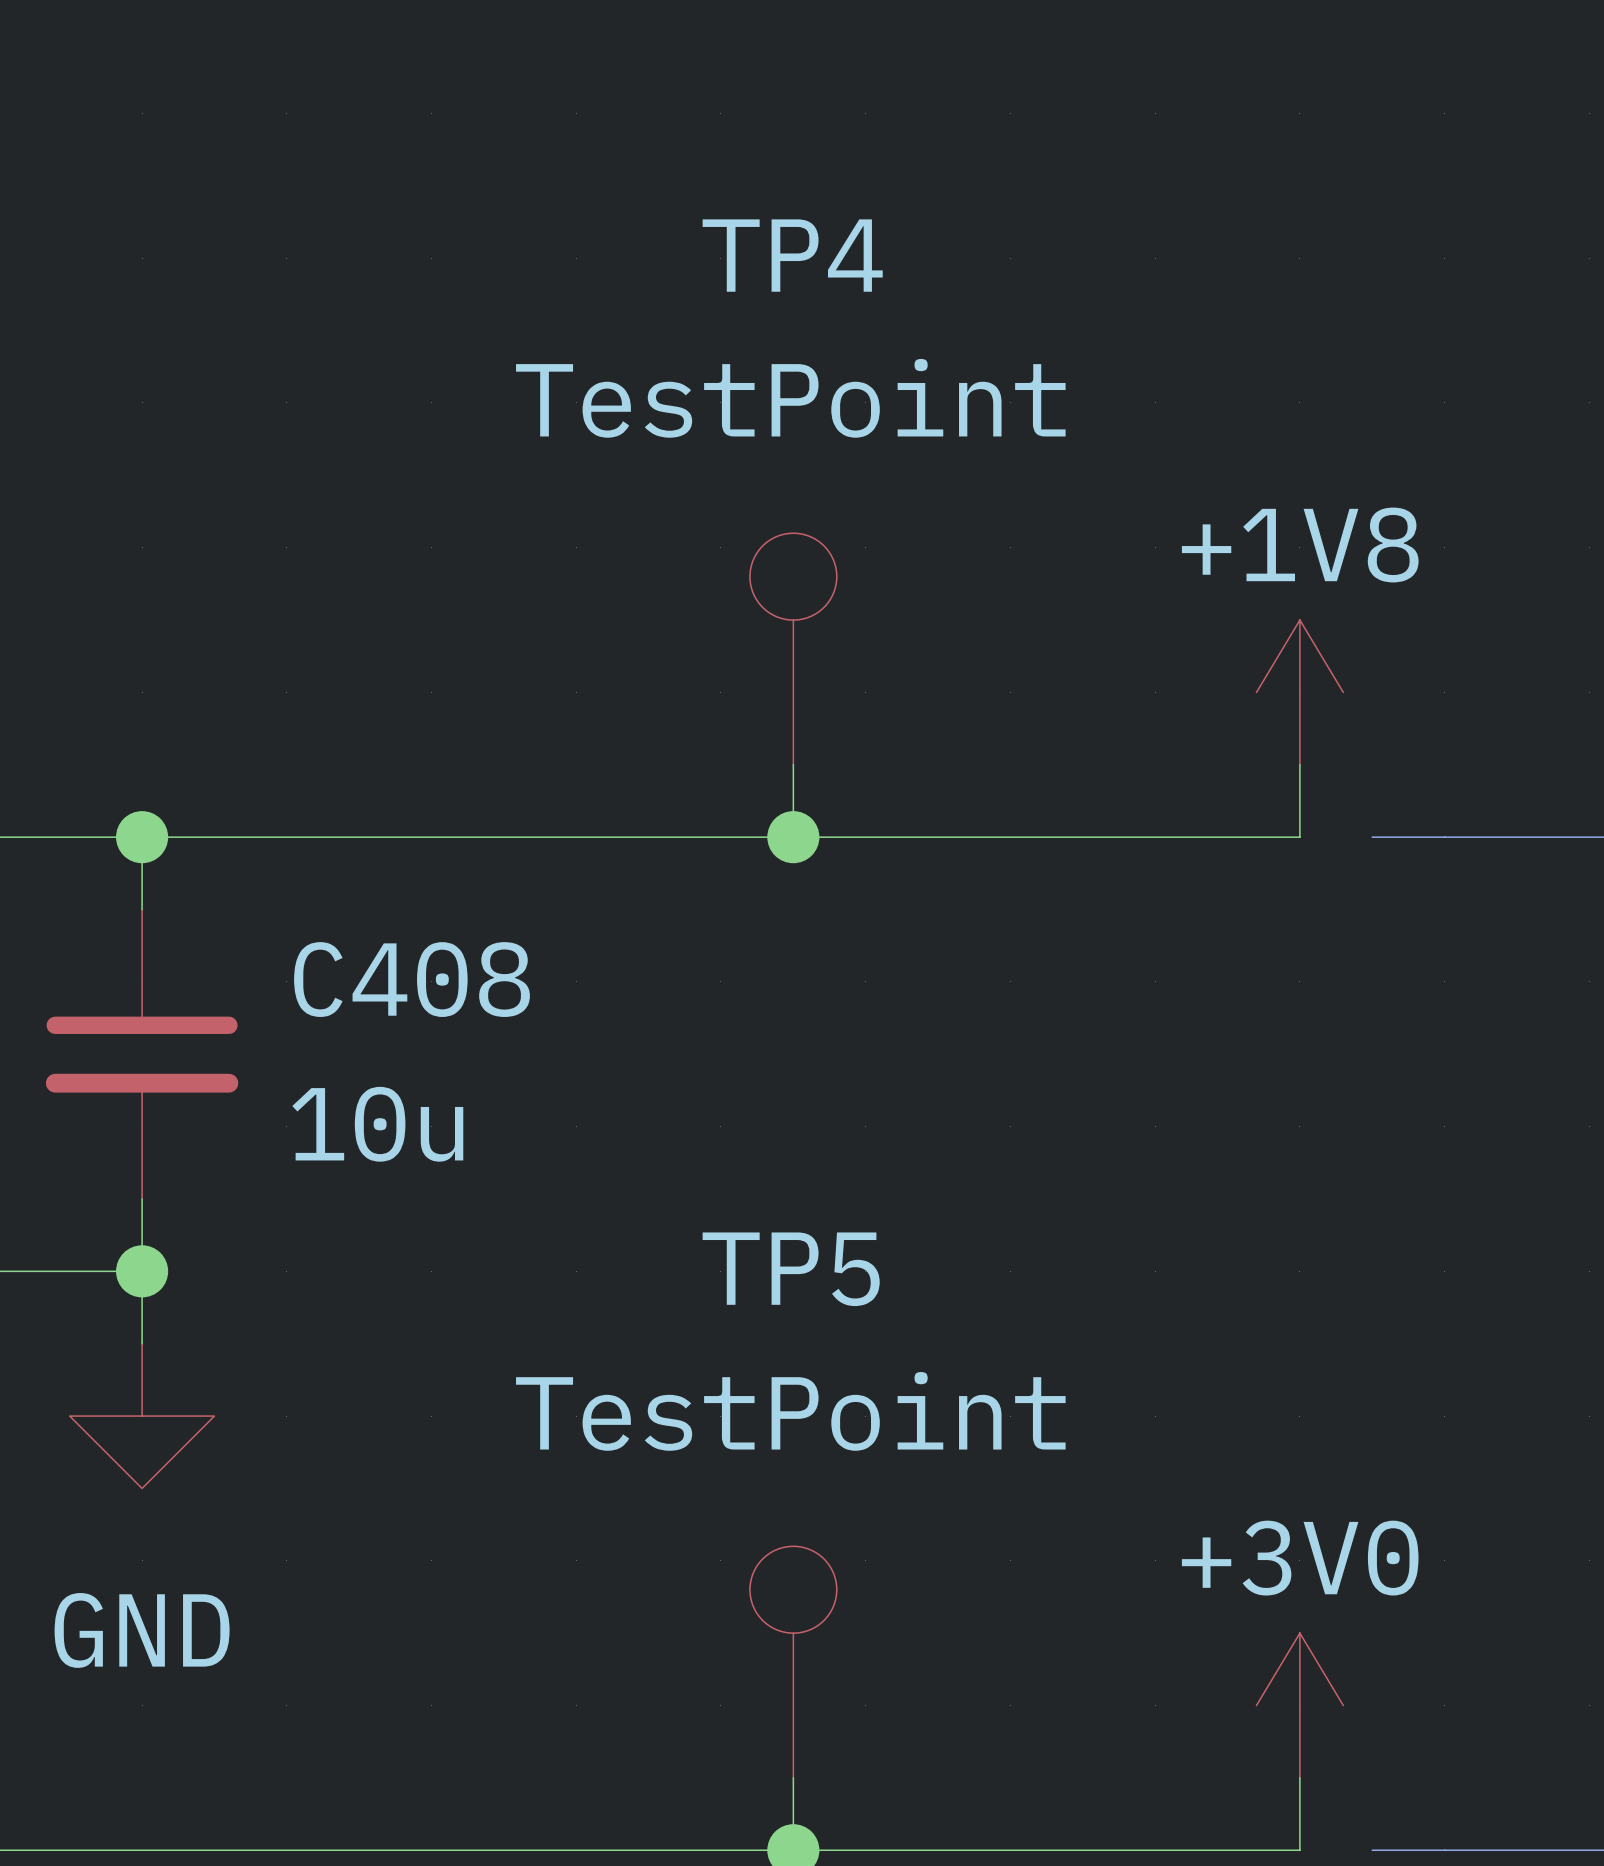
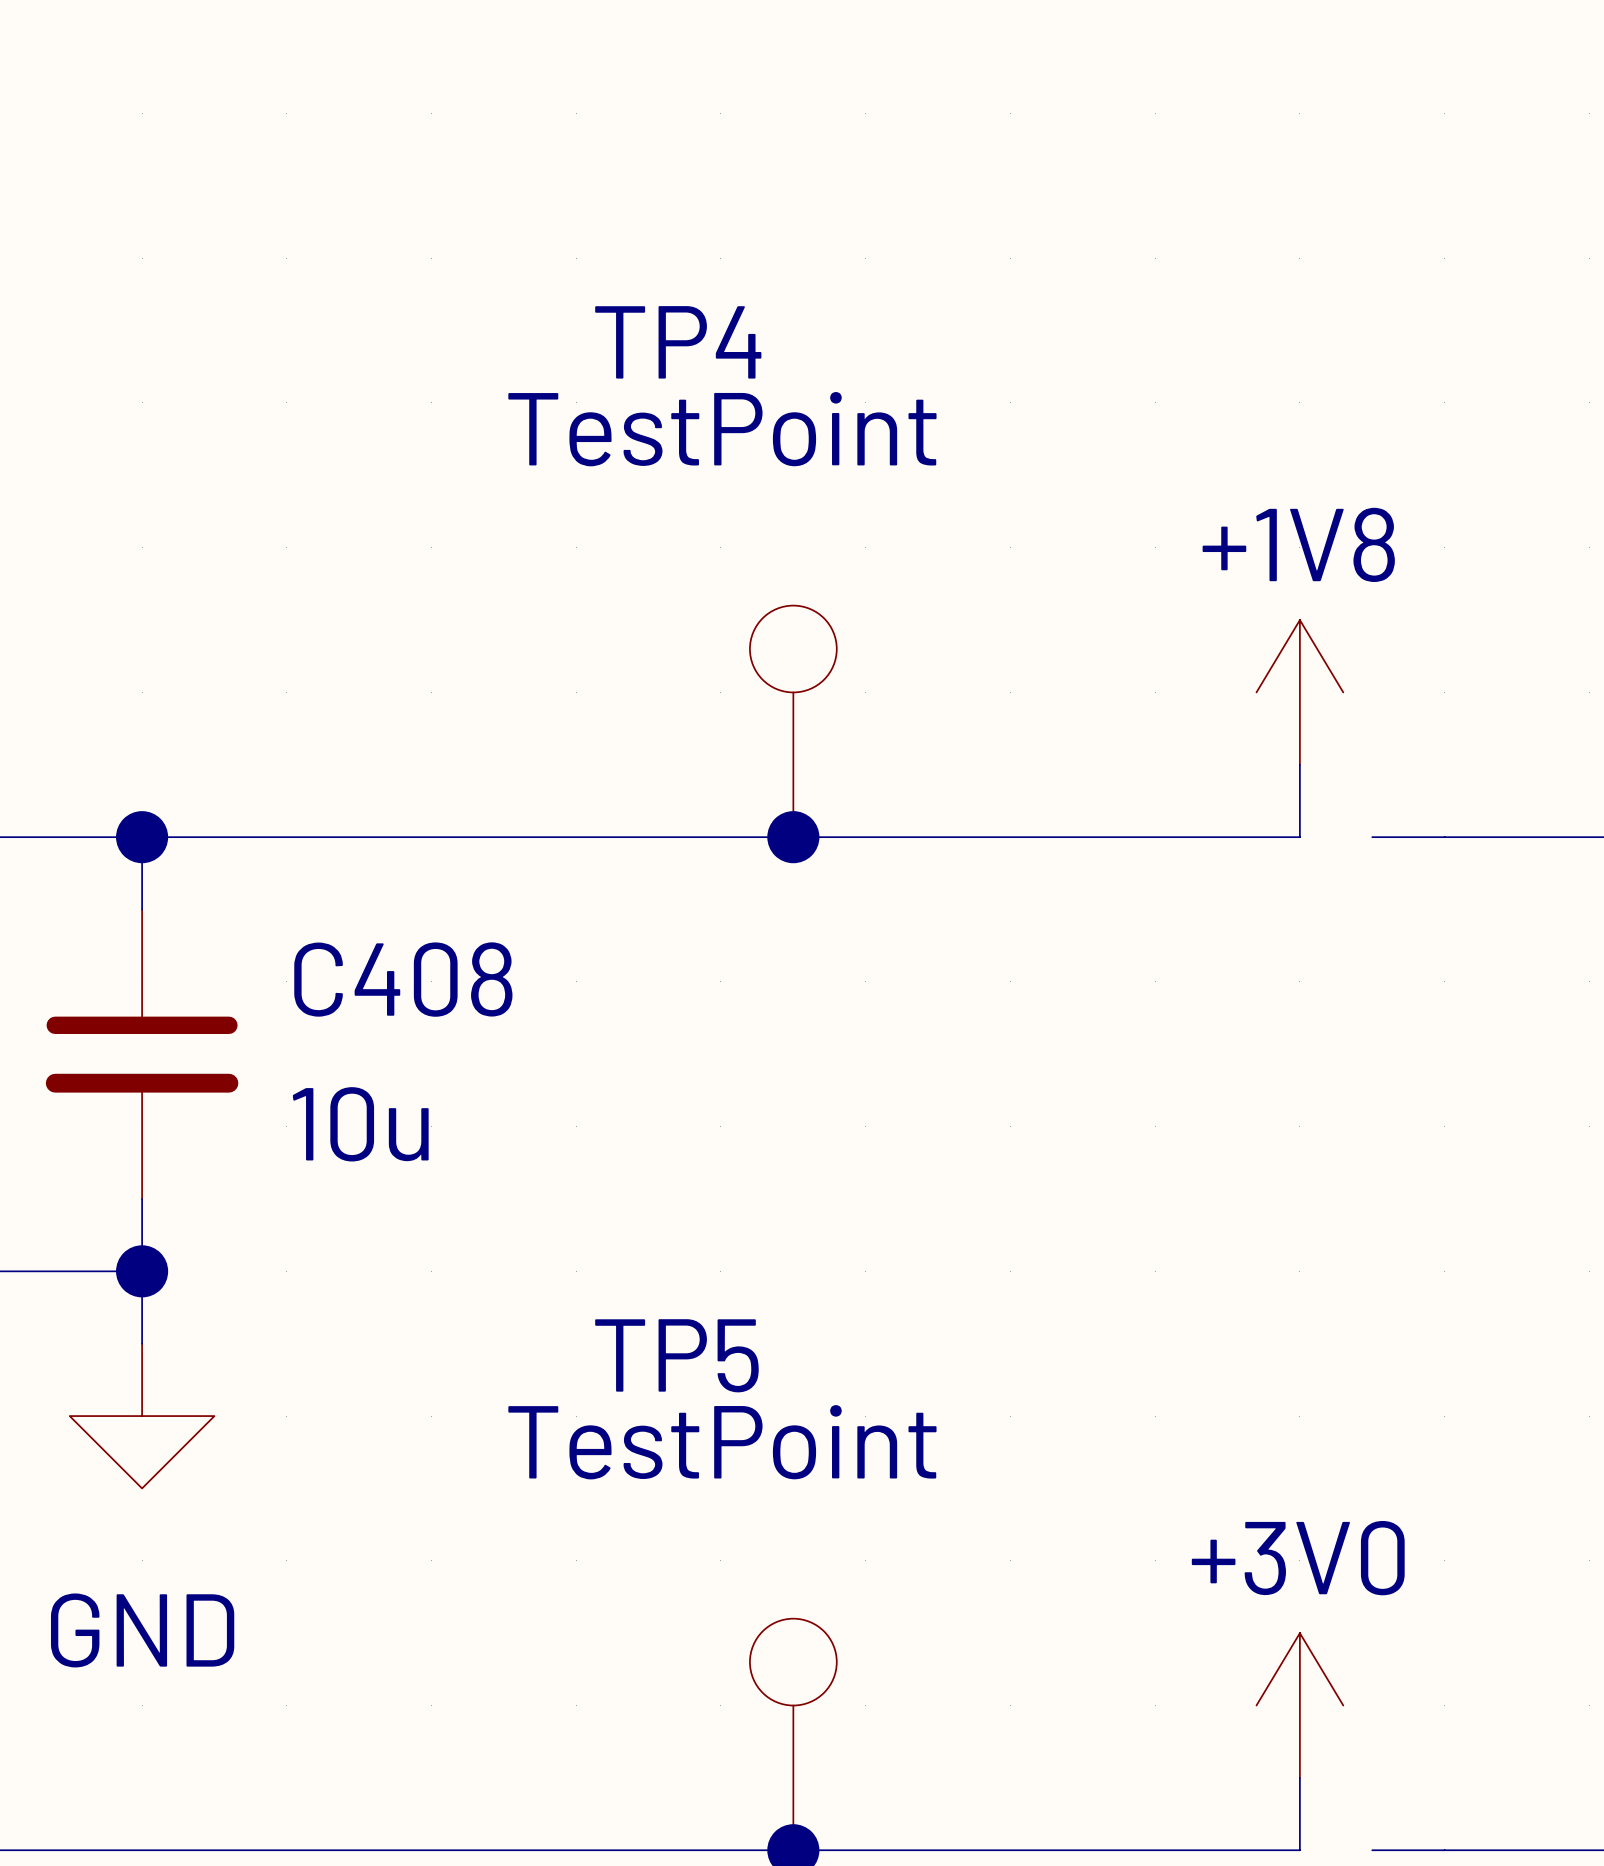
TP4 name position: TP4 (792, 255) -> TP4 (678, 342)
TP4 value position: TestPoint (790, 398) -> TestPoint (722, 429)
TP4 position: (793, 649) -> (793, 721)
TP5 name position: TP5 (791, 1269) -> TP5 (676, 1355)
TP5 value position: TestPoint (790, 1411) -> TestPoint (722, 1442)
TP5 position: (793, 1662) -> (793, 1734)

